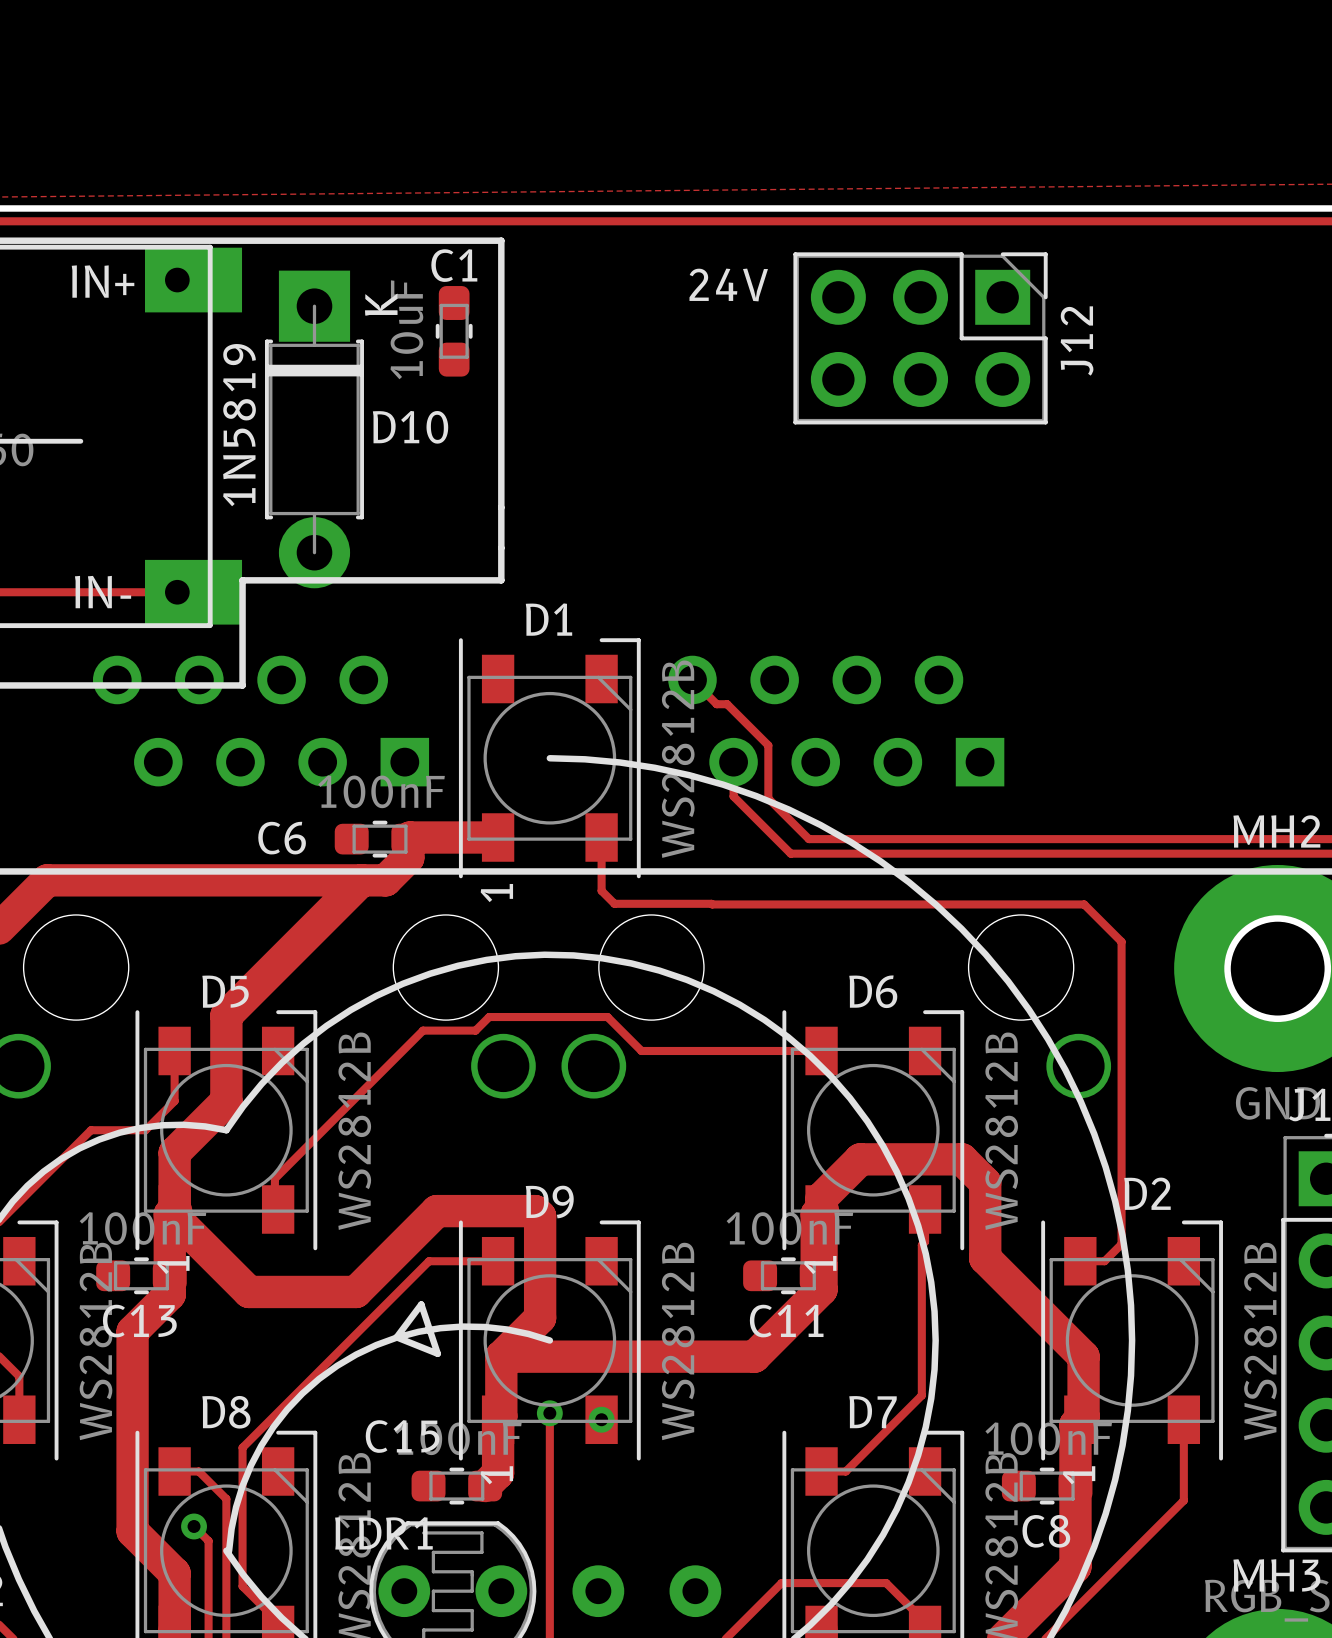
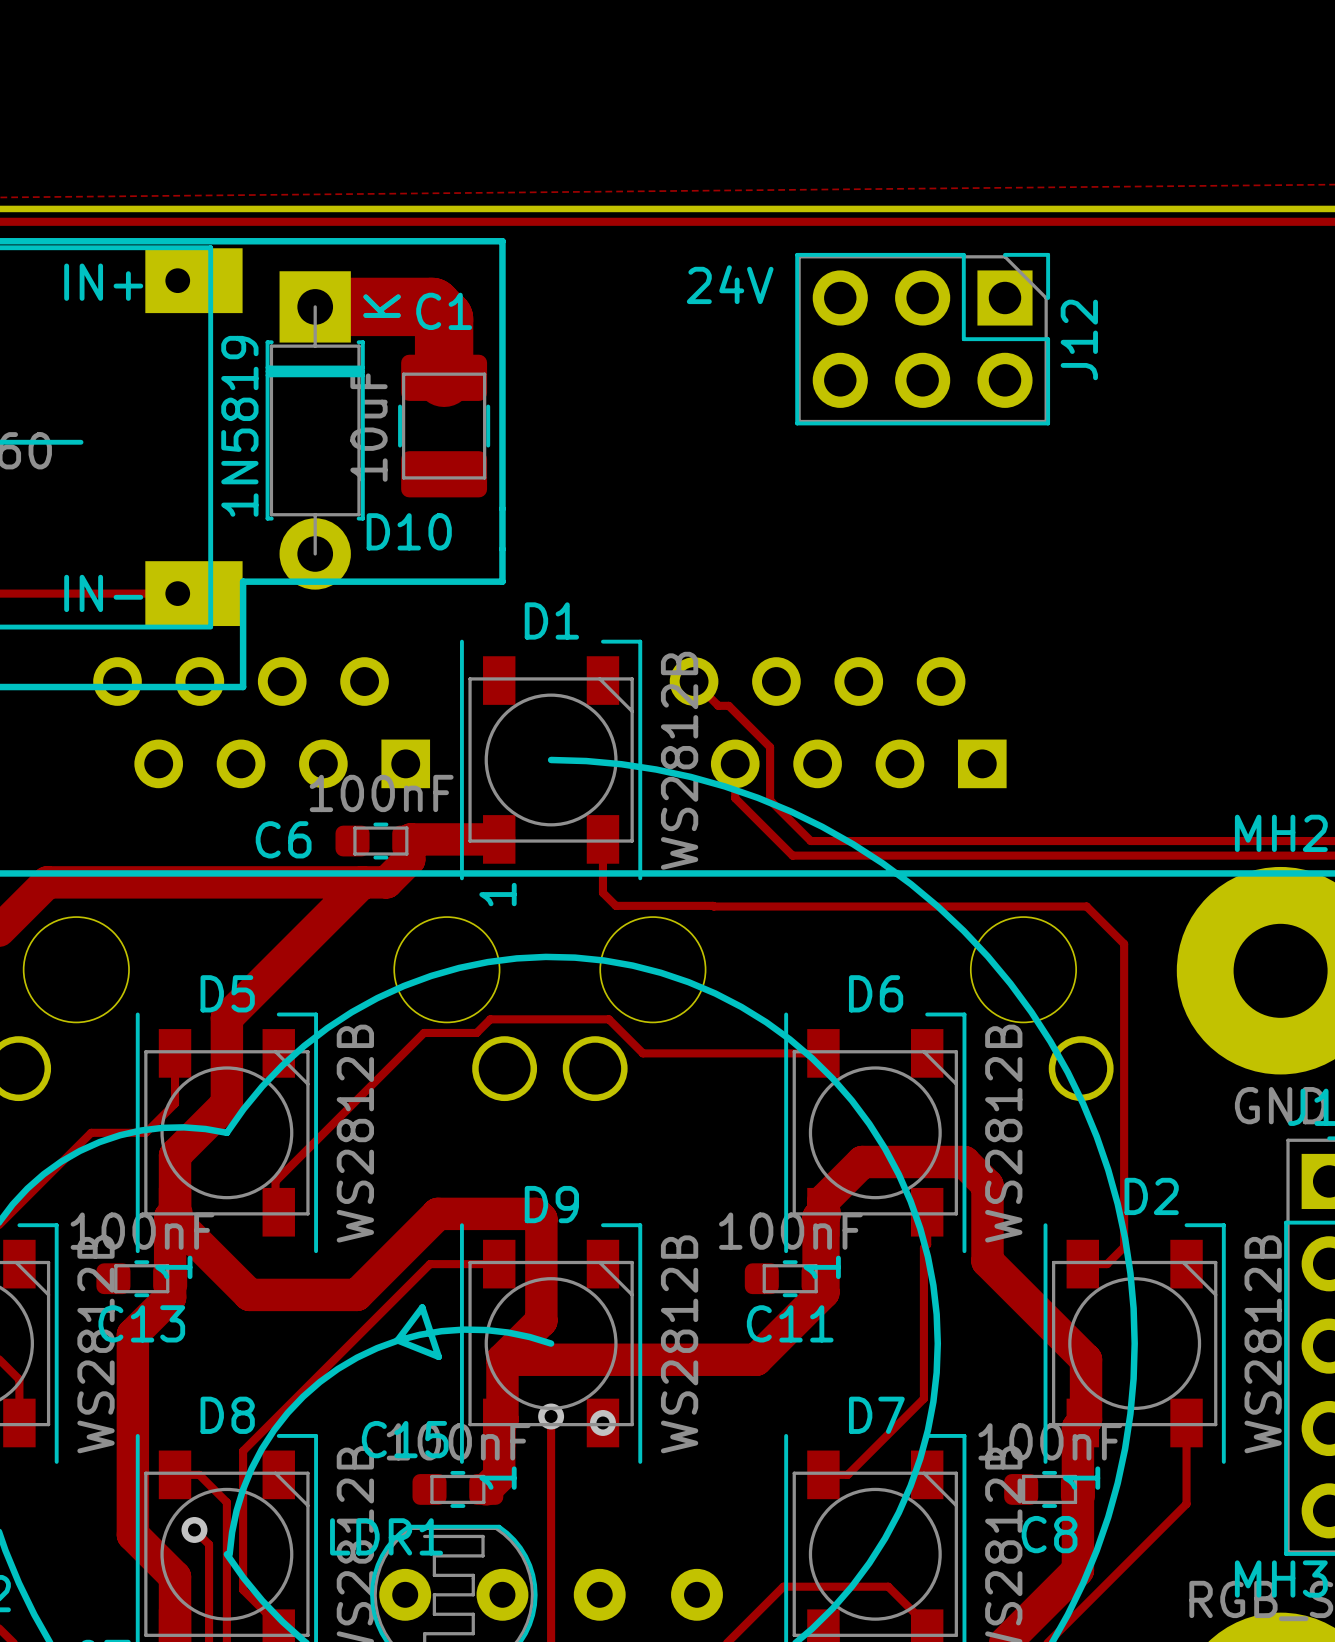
C1 footprint: [435, 286, 473, 377] -> [398, 354, 491, 498]
track: none -> (315, 306) (431, 306) (444, 319) (444, 377)
D10 name position: D10 (410, 427) -> D10 (409, 531)

